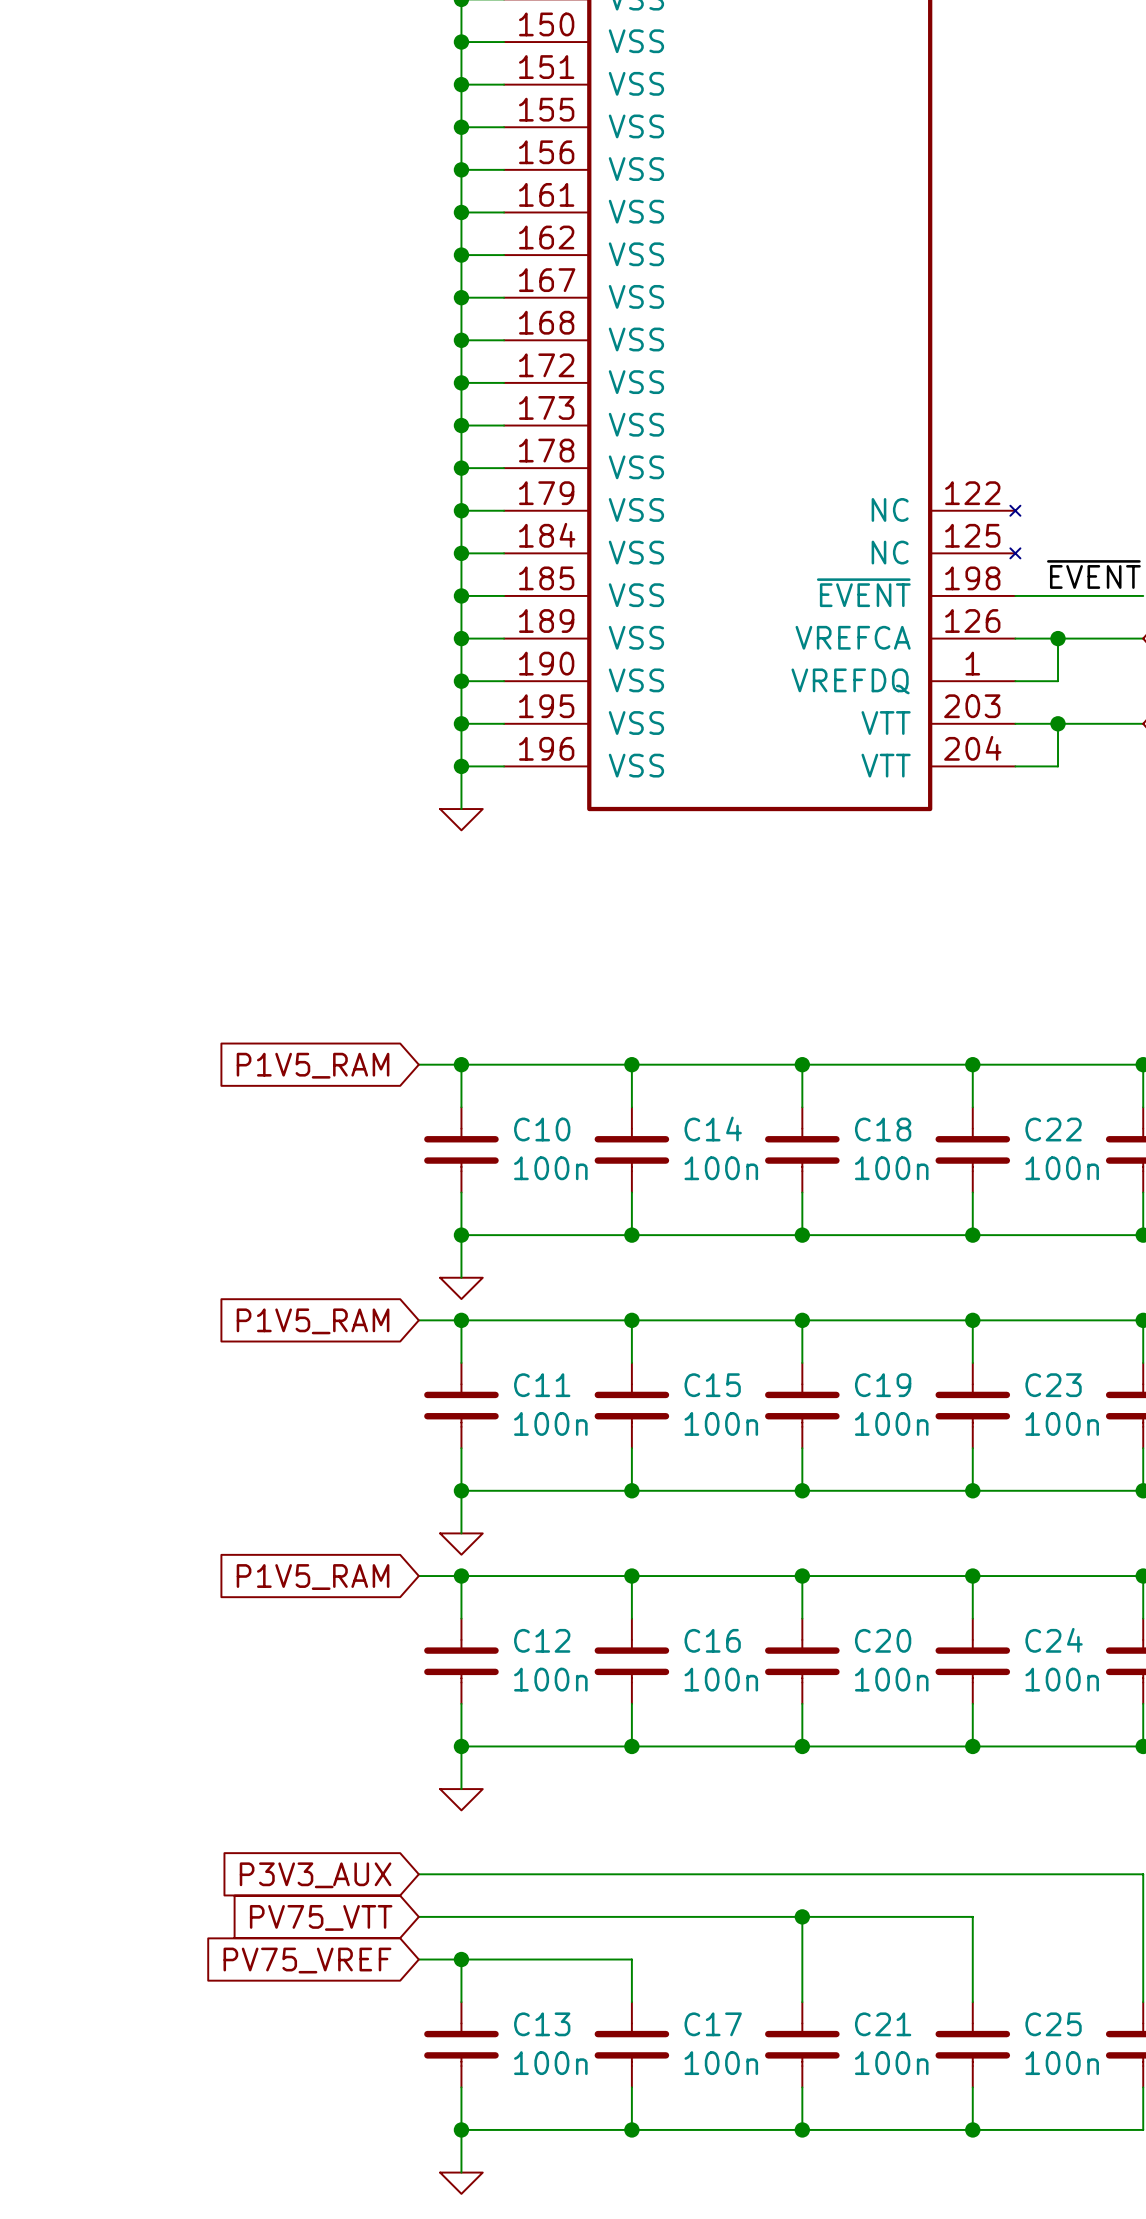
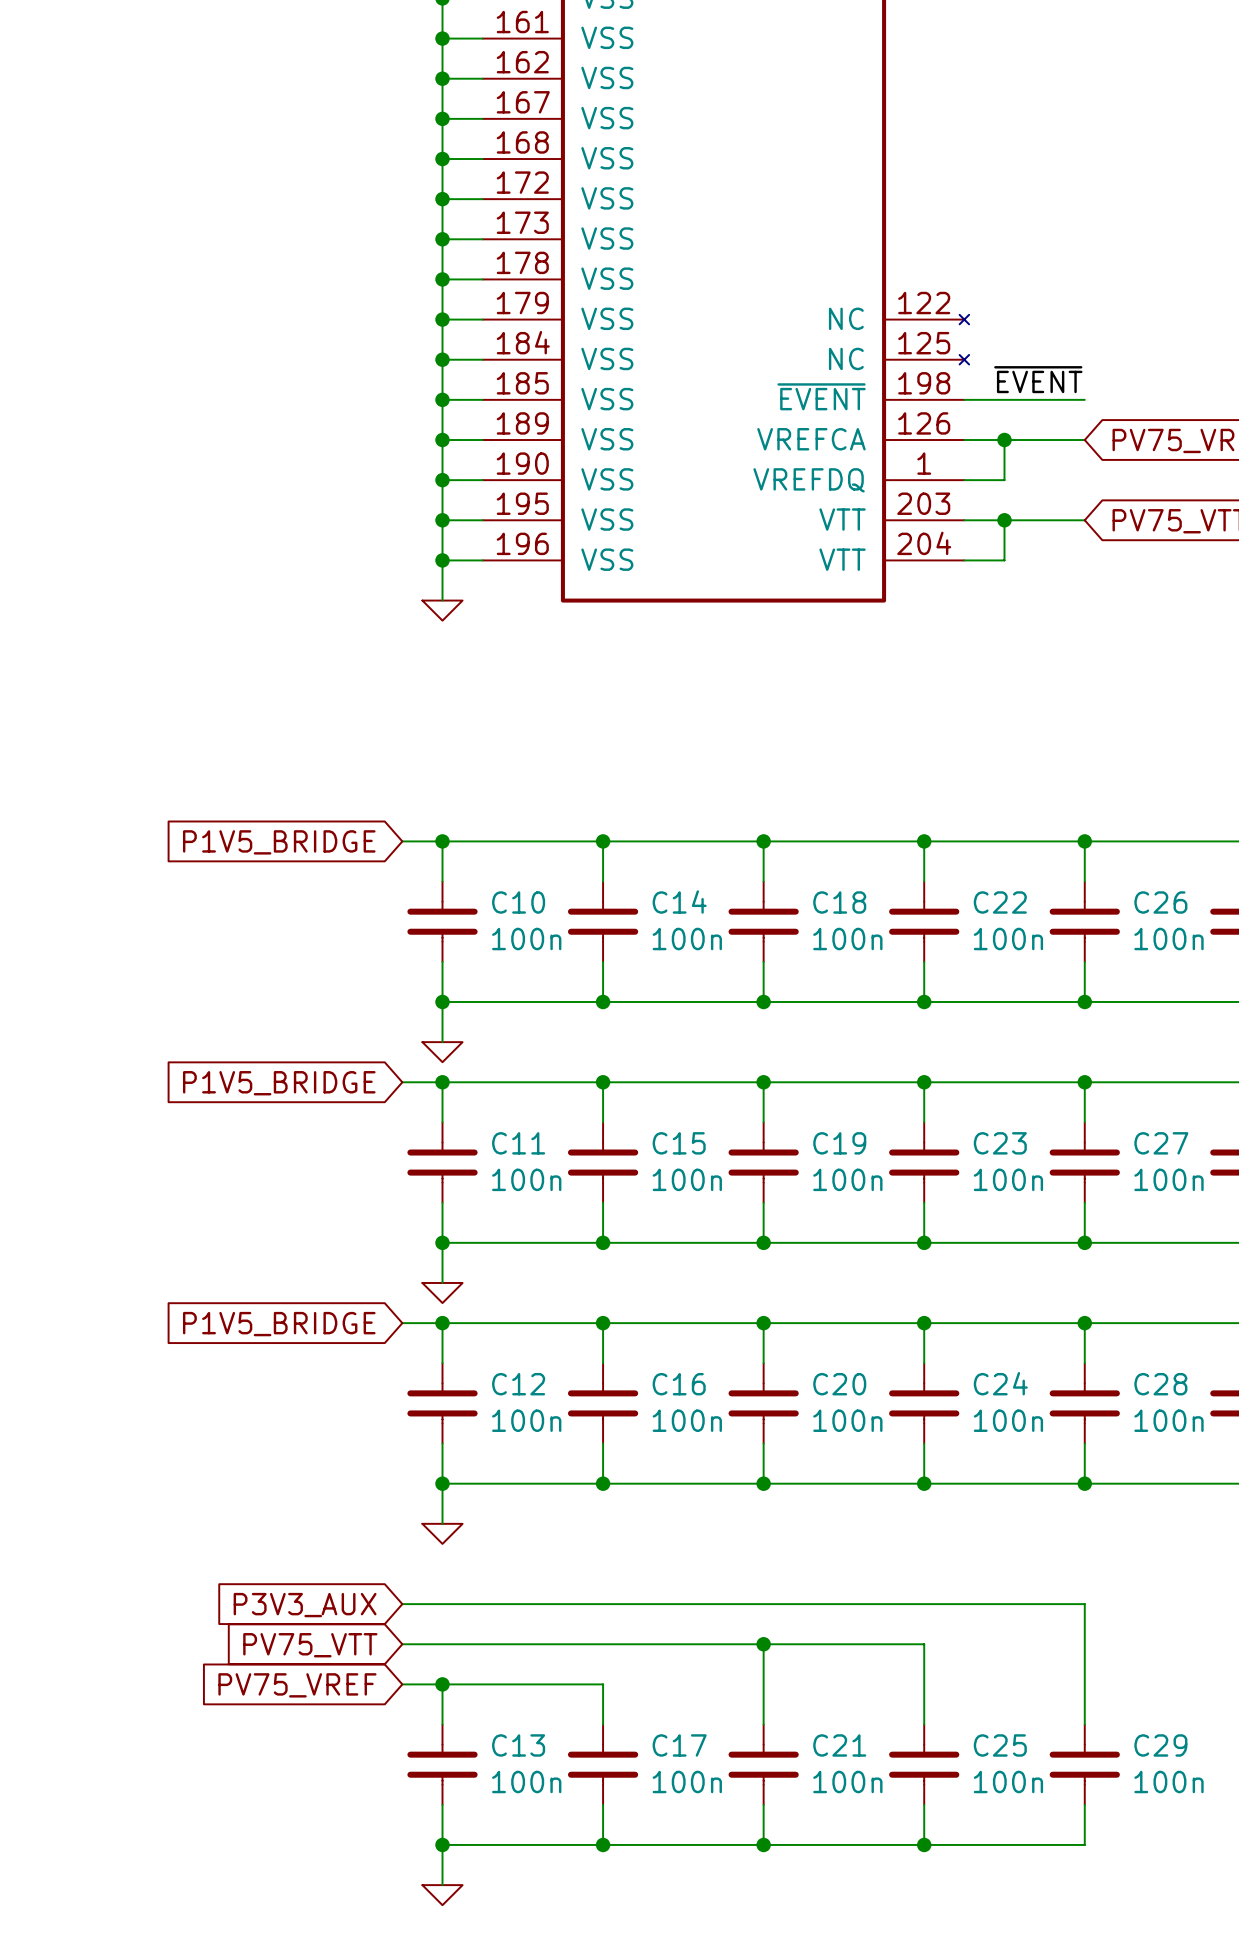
global label: P1V5_RAM (313, 1065) -> P1V5_BRIDGE (279, 842)
global label: P1V5_RAM (313, 1321) -> P1V5_BRIDGE (279, 1083)
global label: P1V5_RAM (313, 1577) -> P1V5_BRIDGE (279, 1324)

